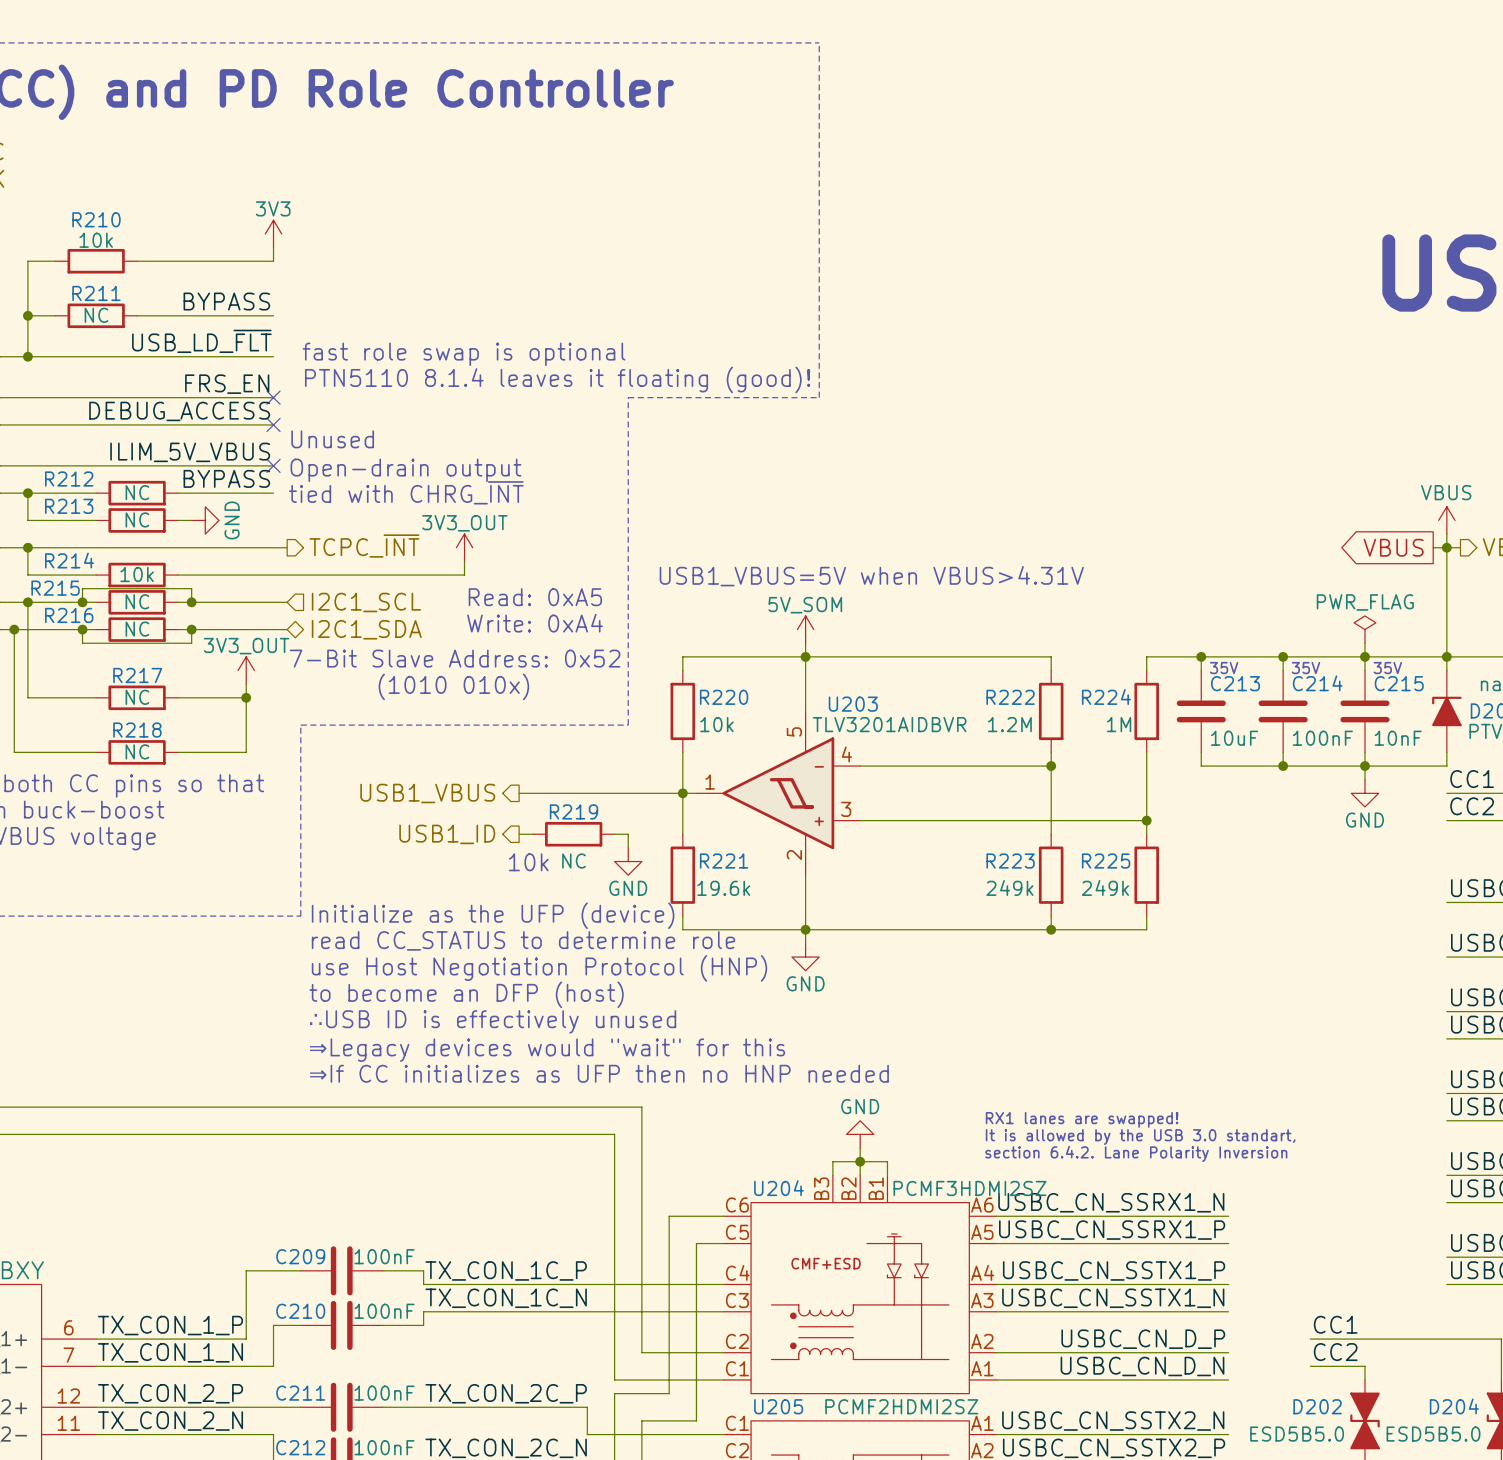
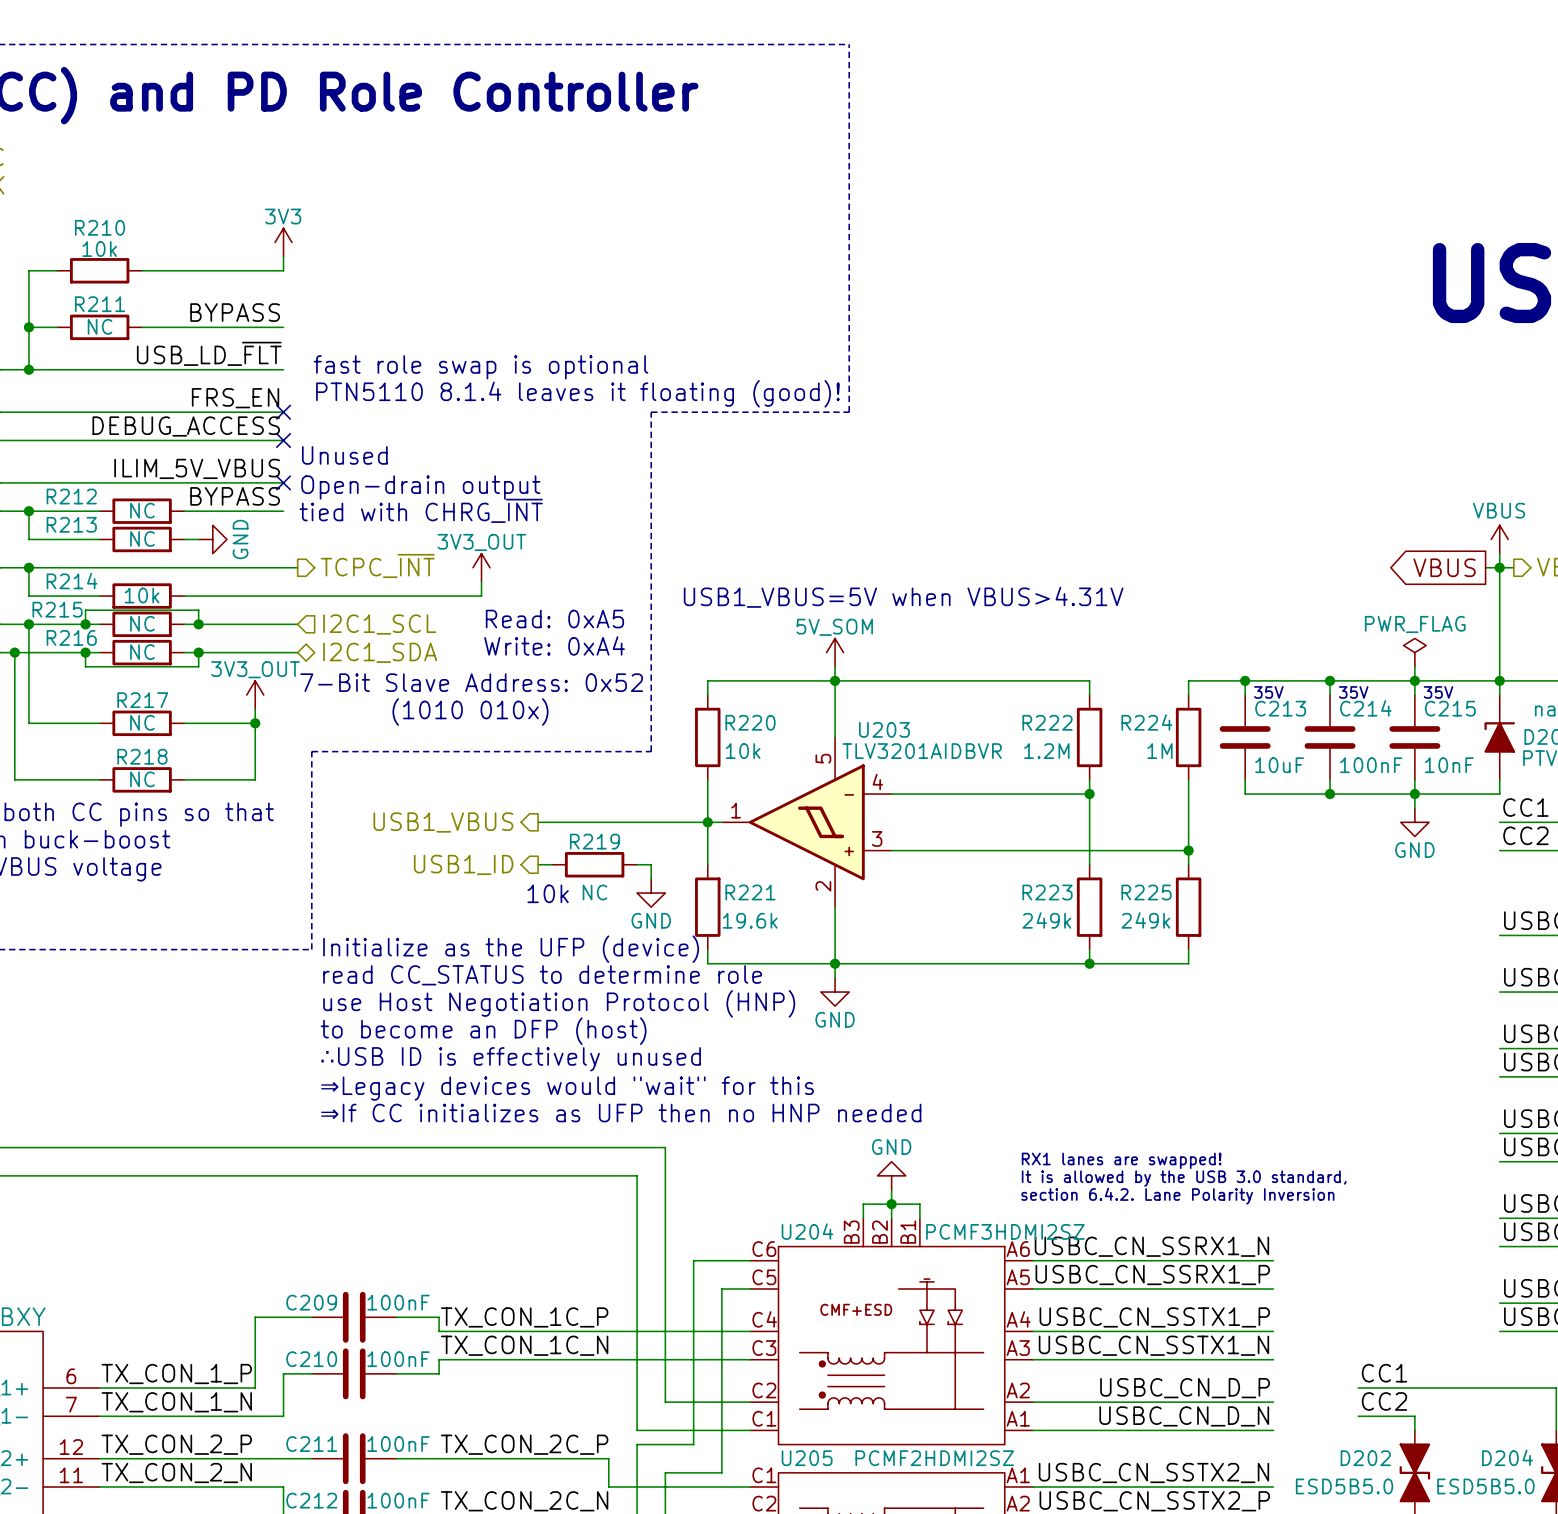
text: It is allowed by the USB 3.0 standart, (1140, 1137) -> It is allowed by the USB 3.0 standard, (1184, 1178)

